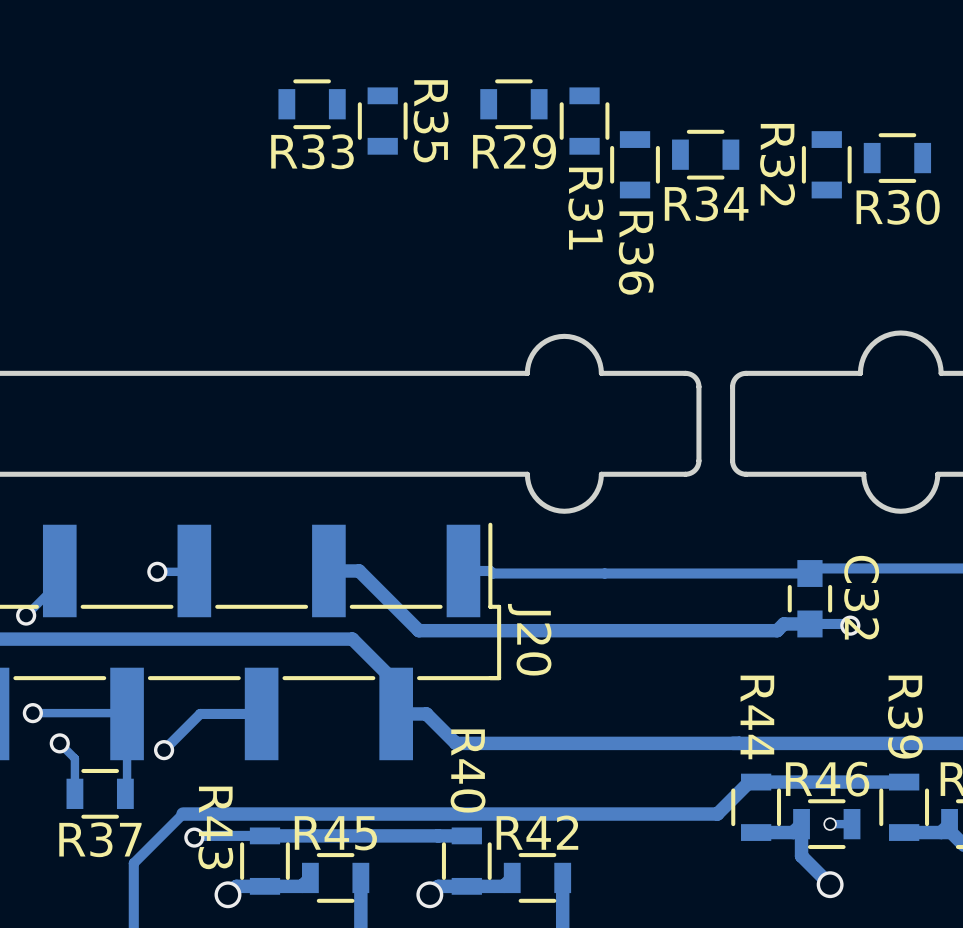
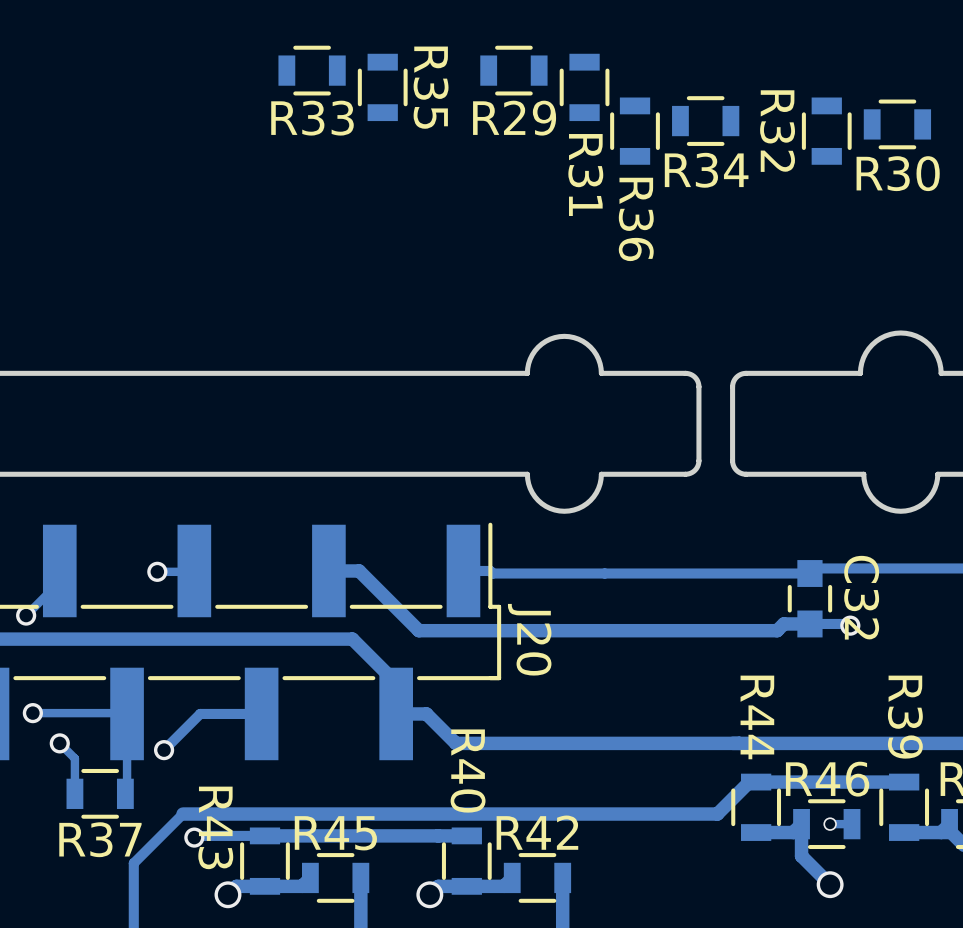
R33 position: (312, 104) -> (312, 70)
R29 position: (513, 104) -> (513, 70)
R35 position: (382, 121) -> (382, 87)
R31 position: (584, 121) -> (584, 87)
R34 position: (705, 154) -> (705, 121)
R30 position: (897, 158) -> (897, 124)
R36 position: (635, 164) -> (635, 131)
R32 position: (826, 164) -> (826, 131)

